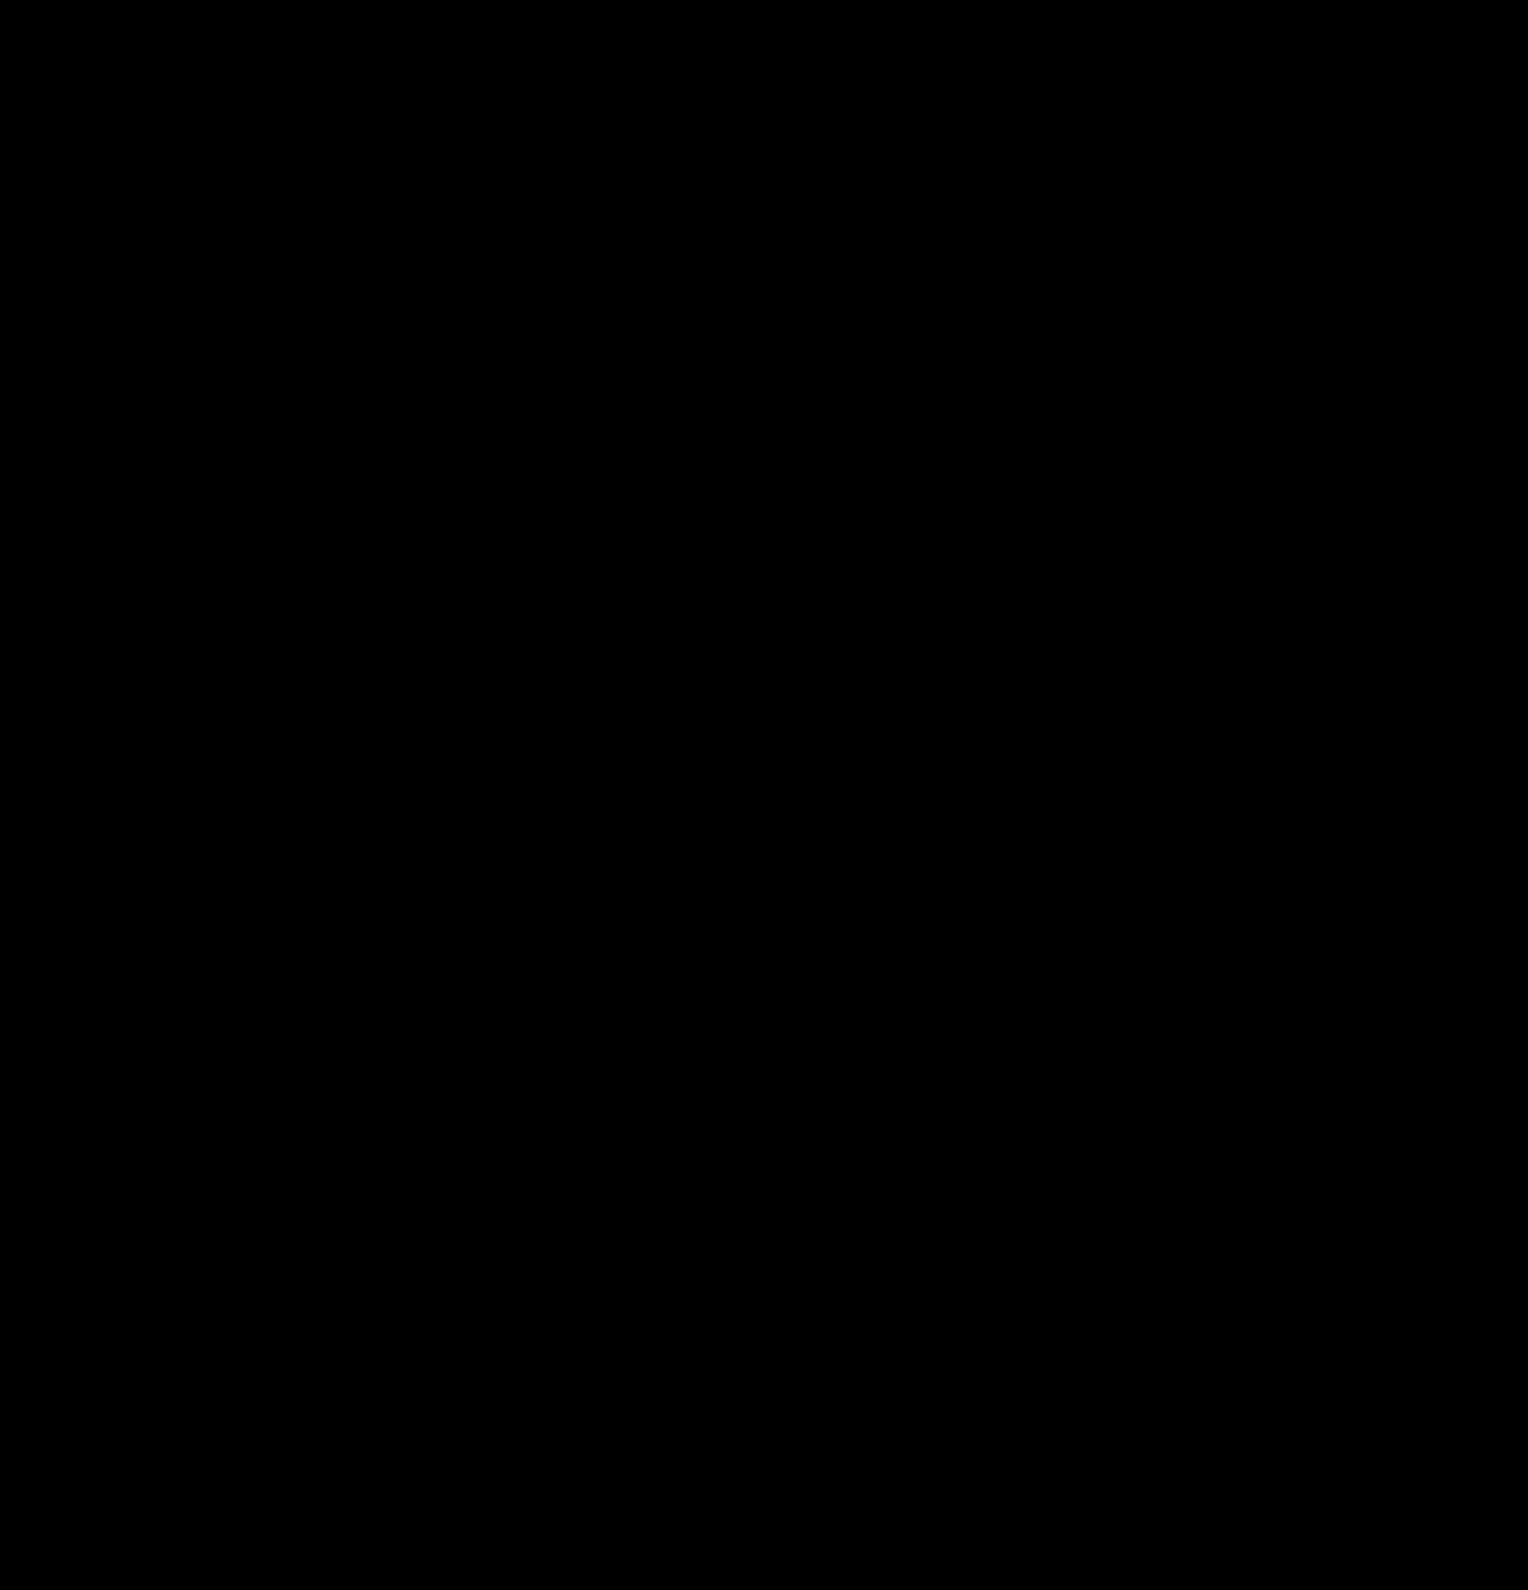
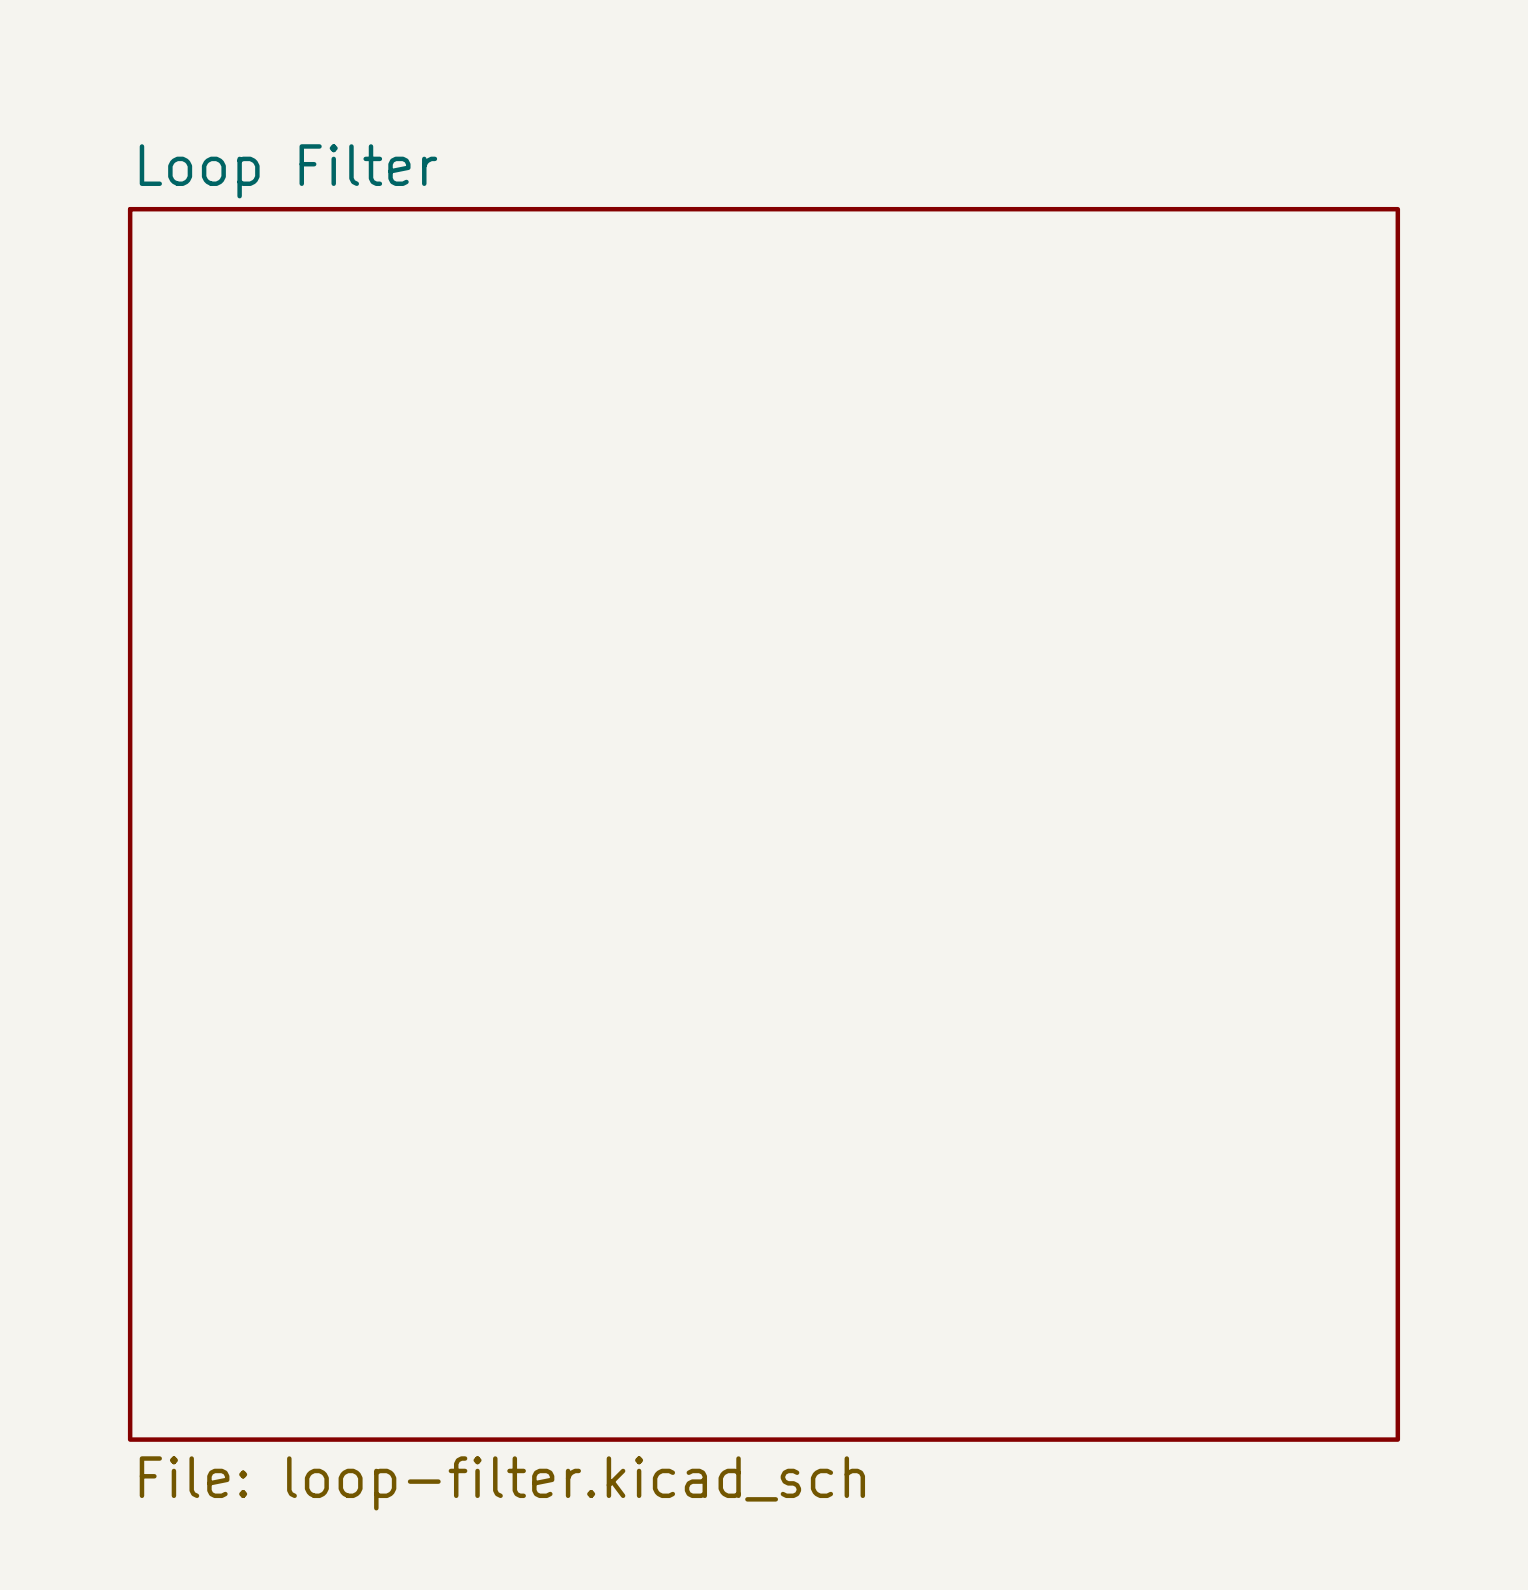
sheet Loop Filter: none -> File: loop-filter.kicad_sch (763, 824)

